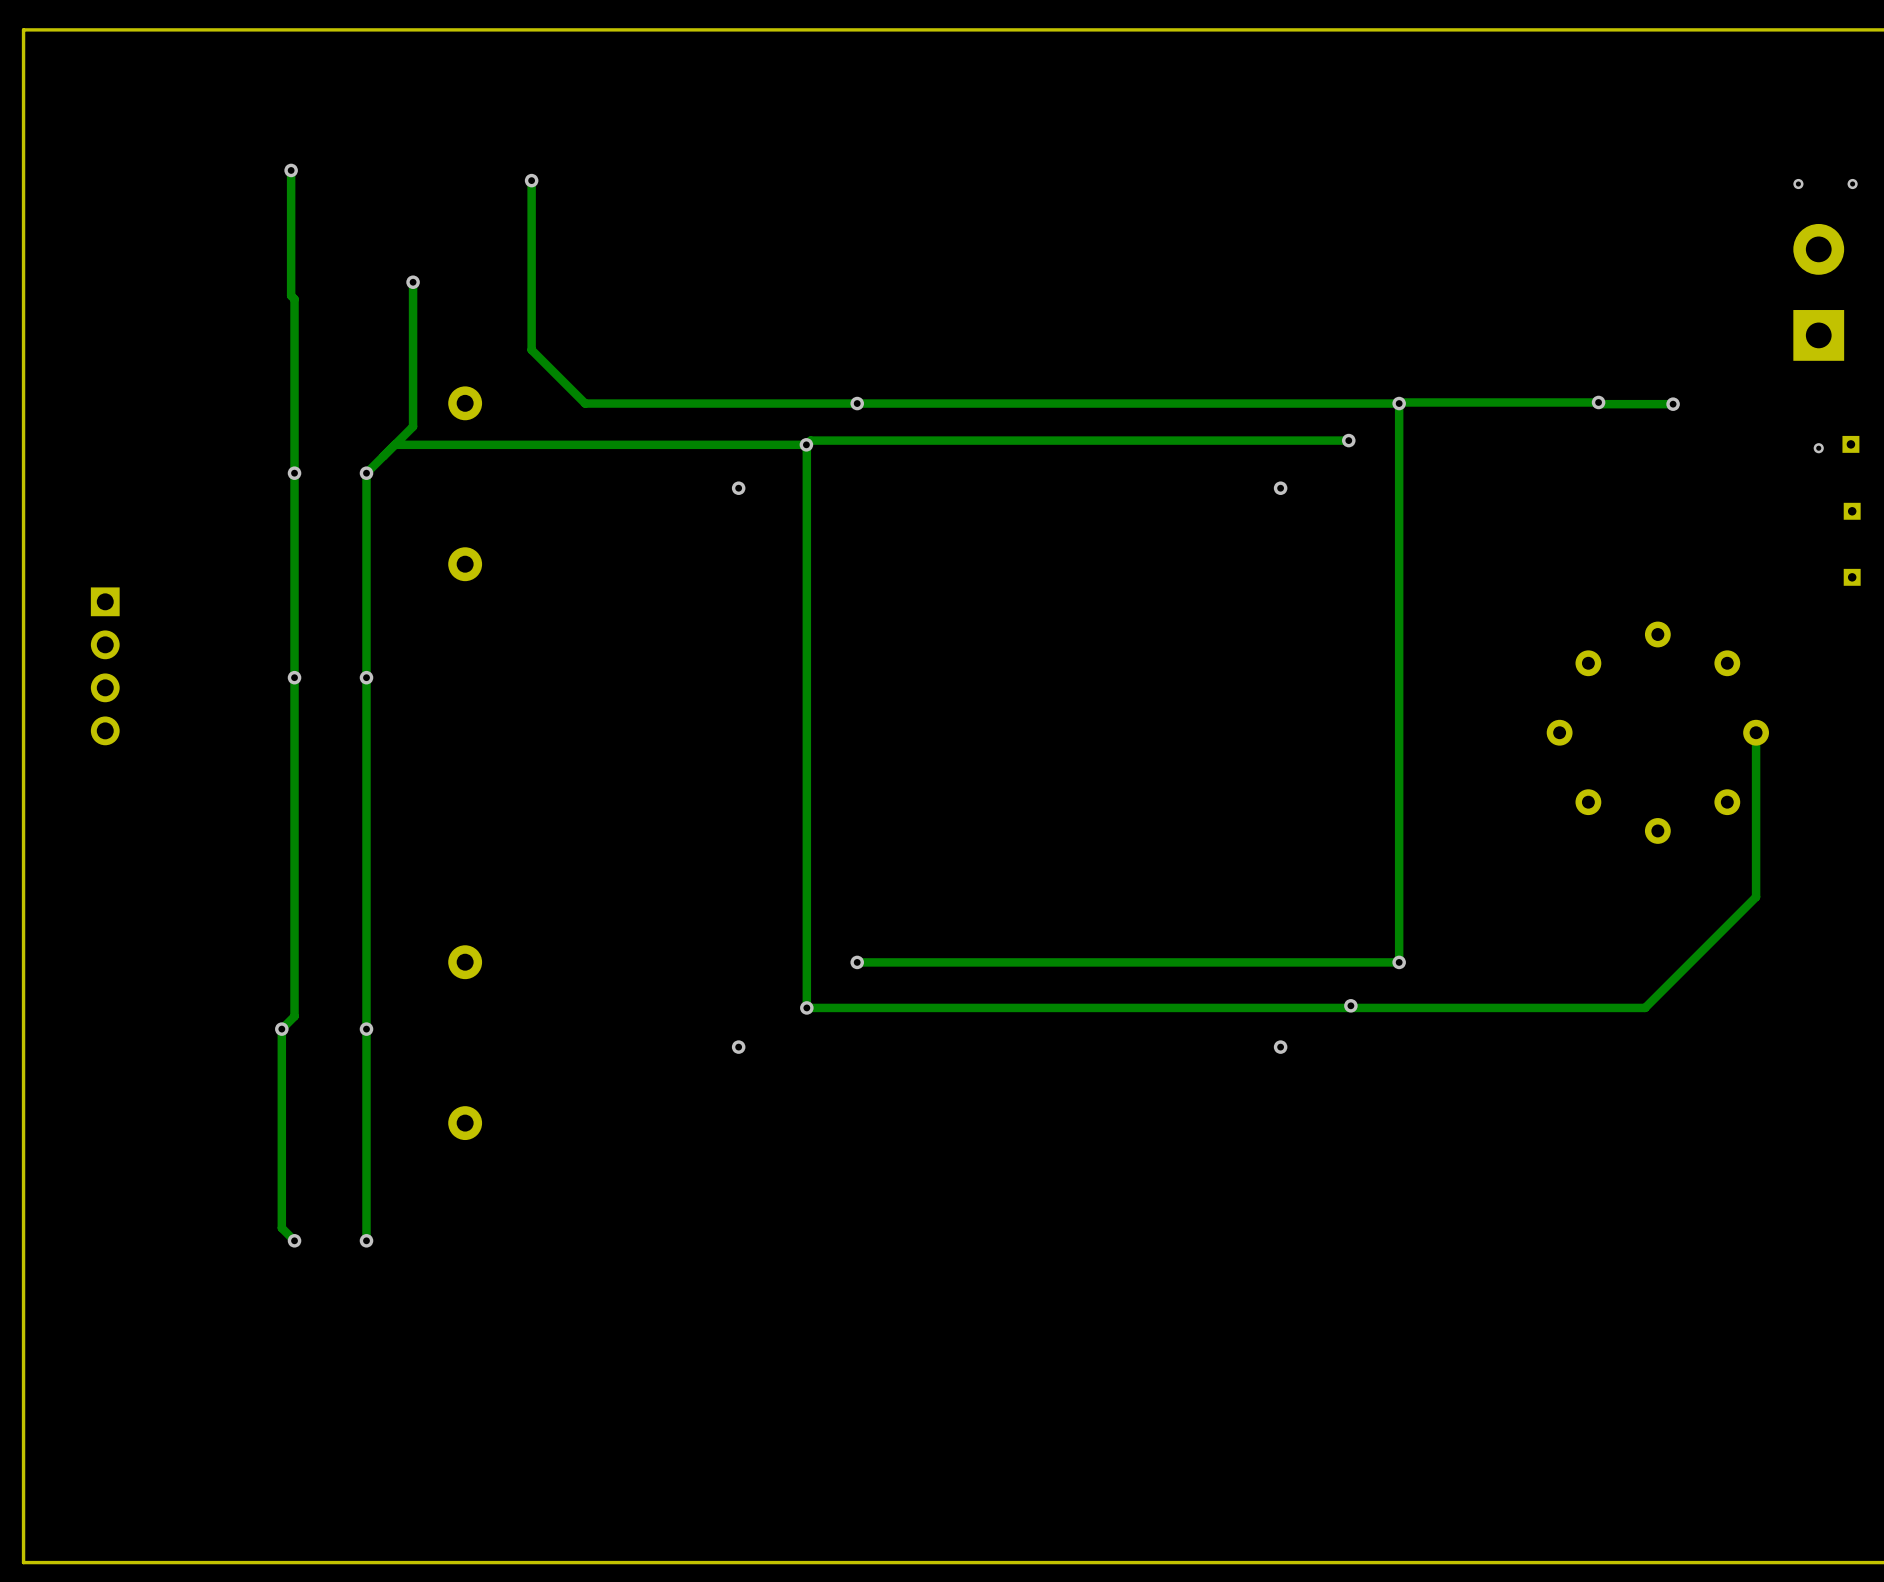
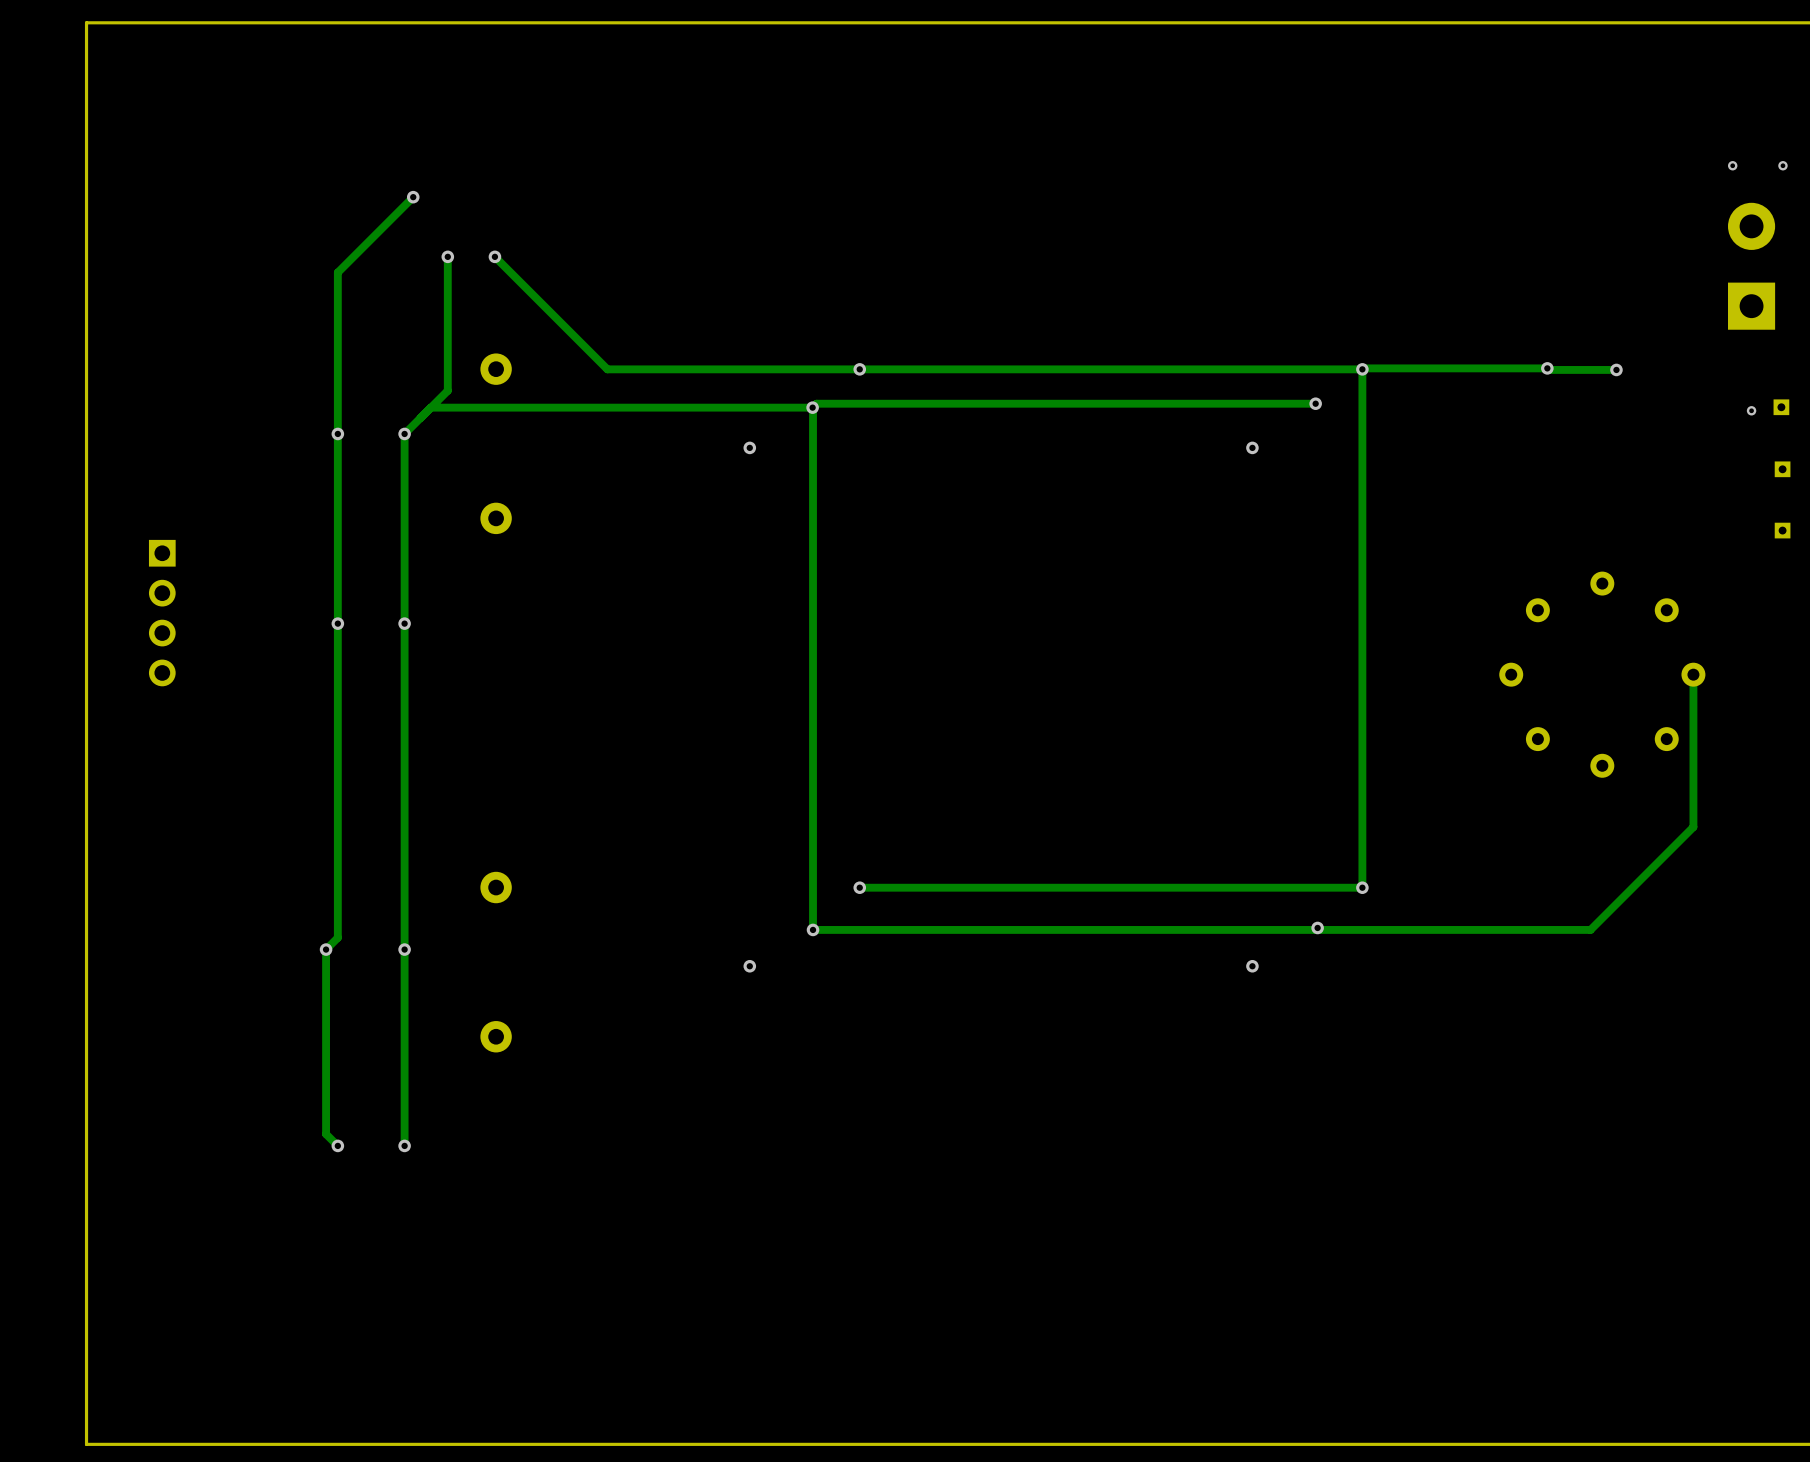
track: (291, 170) (291, 295) (294, 299) -> (413, 197) (337, 272)
via: (291, 170) -> none
track: (531, 180) (531, 349) -> (494, 256) (557, 319)
via: (531, 180) -> none
via: none -> (413, 197)
via: none -> (494, 256)

